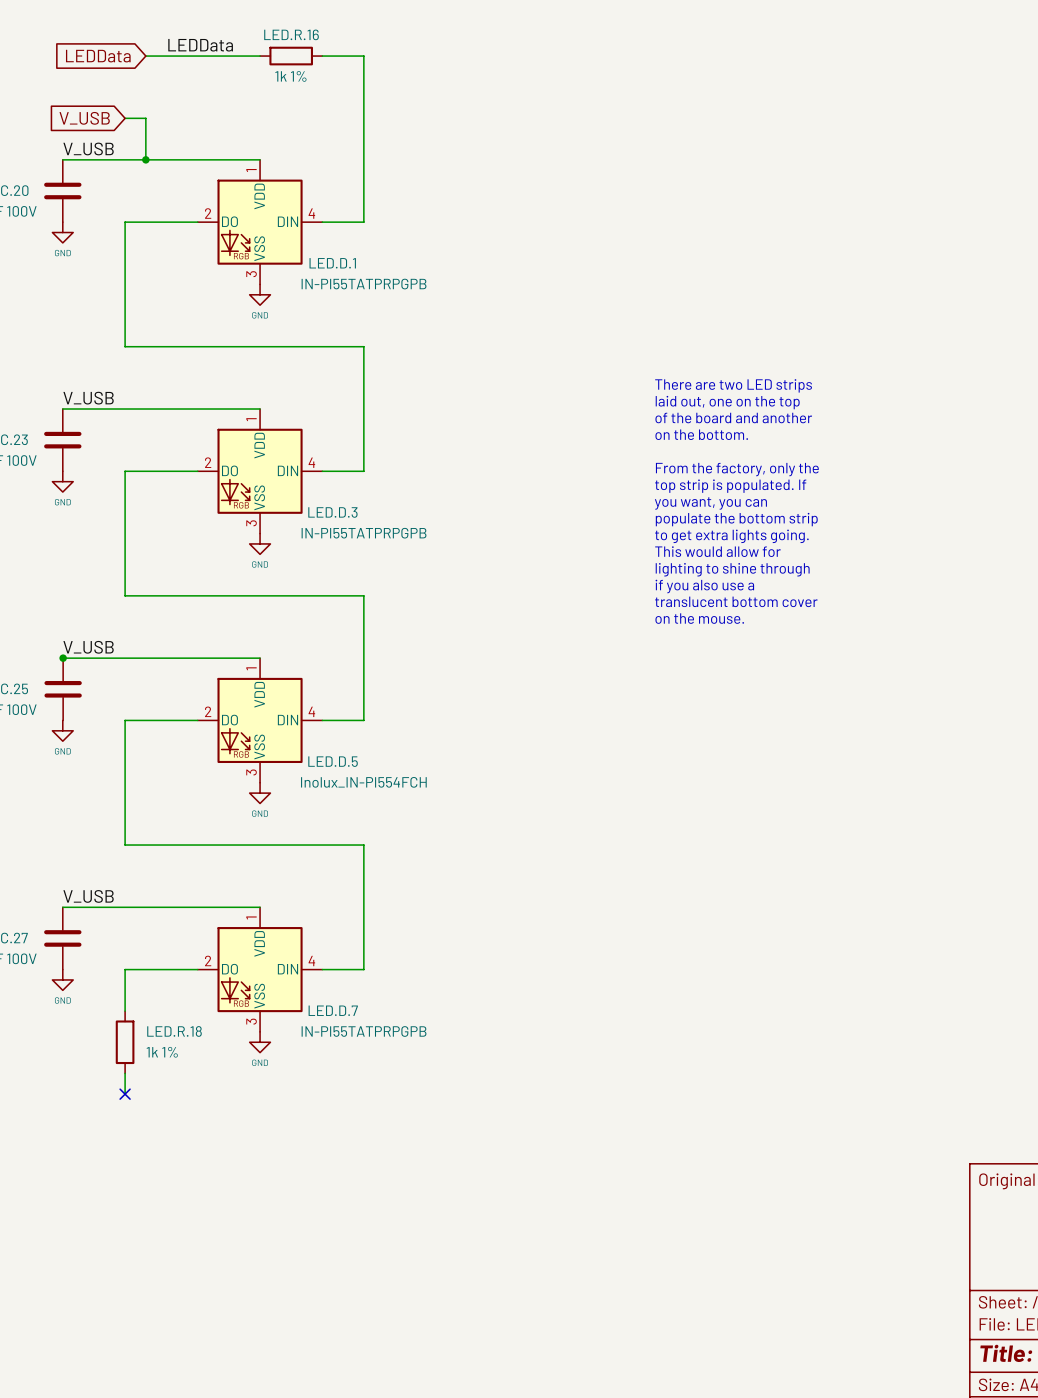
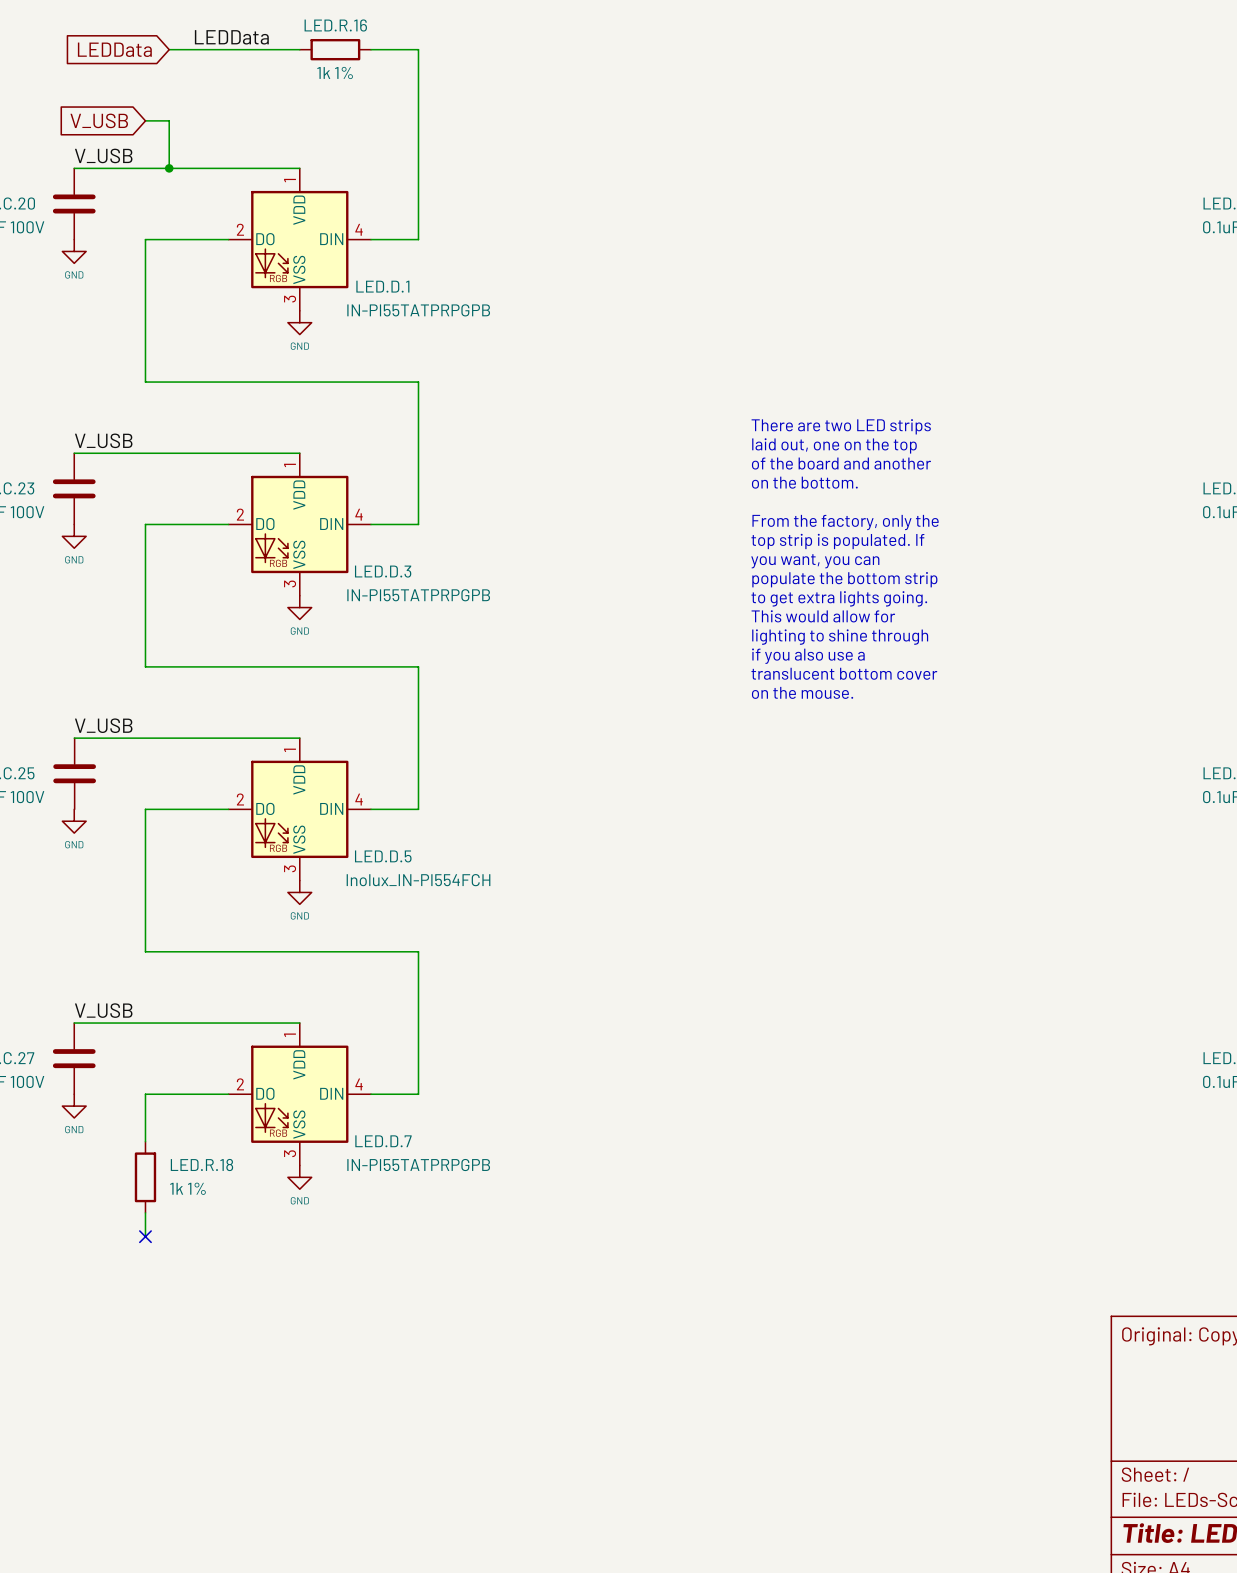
junction: (63, 658) -> none

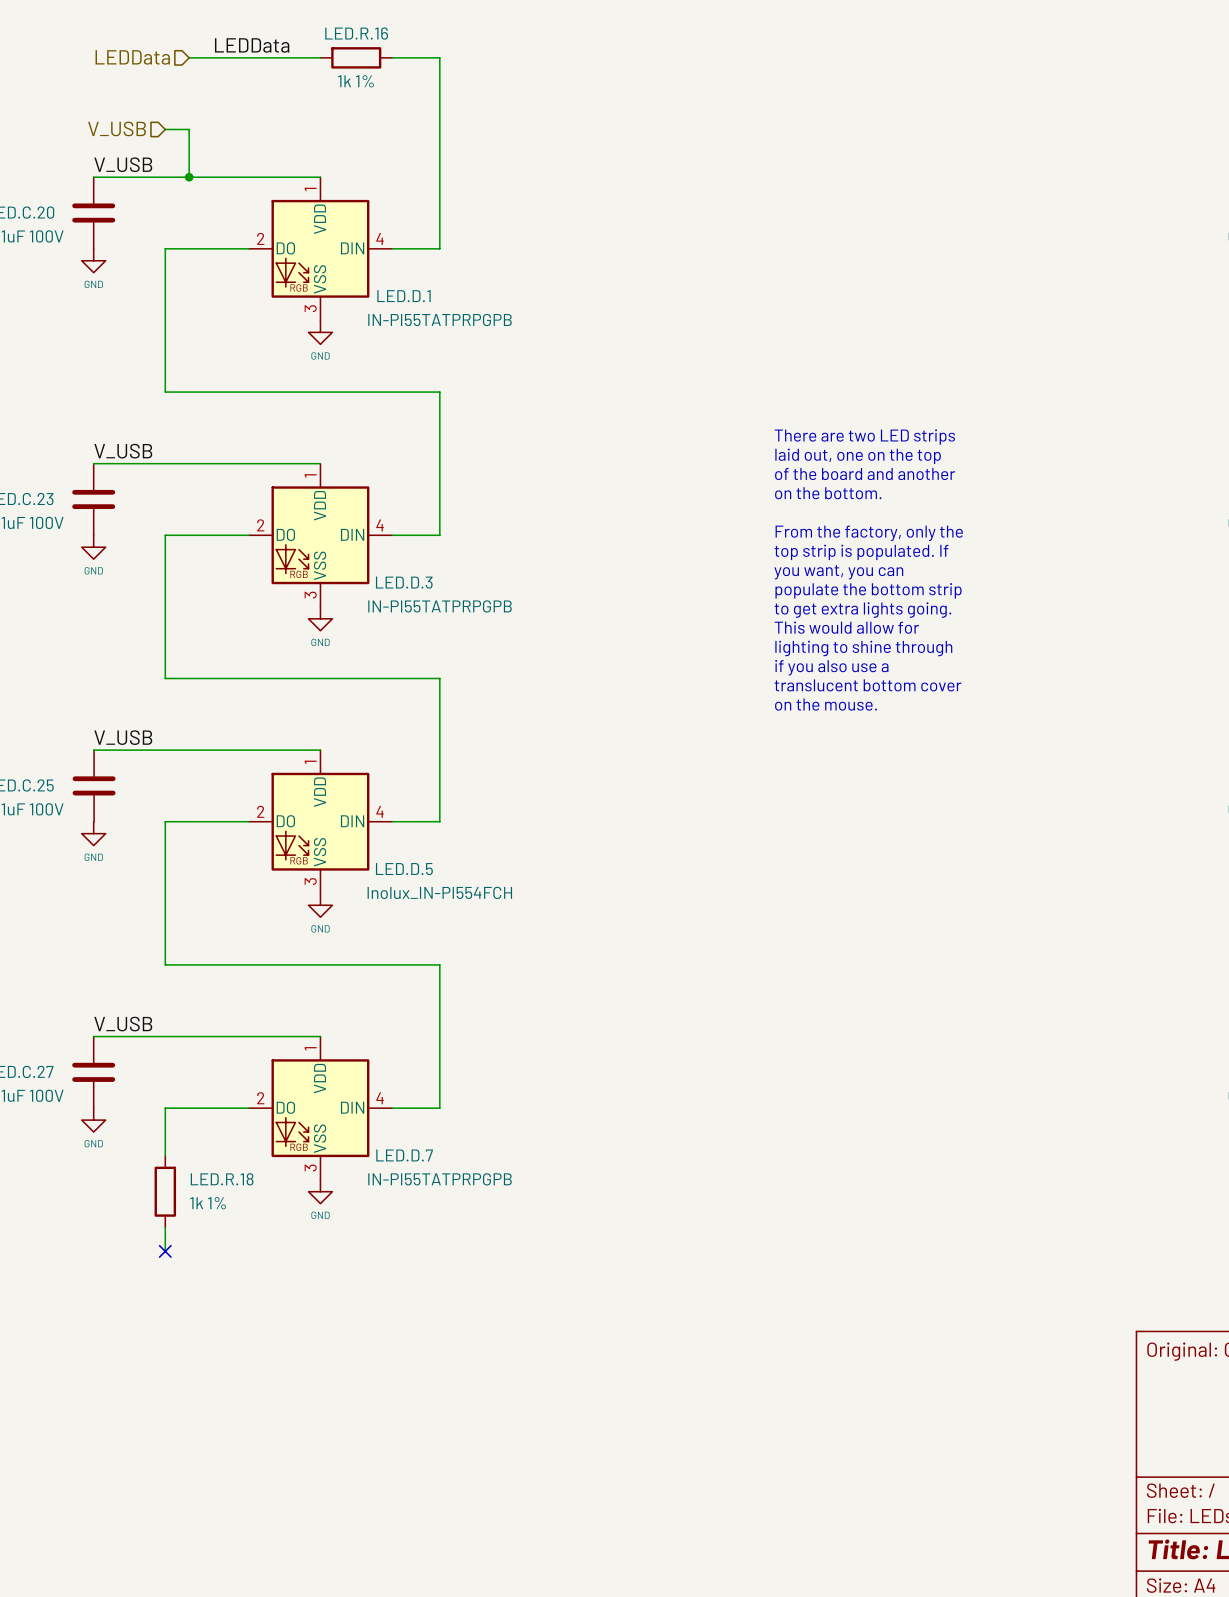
hierarchical label: none -> LEDData (132, 57)
global label: LEDData (114, 49) -> none
hierarchical label: none -> V_USB (117, 128)
global label: V_USB (99, 120) -> none

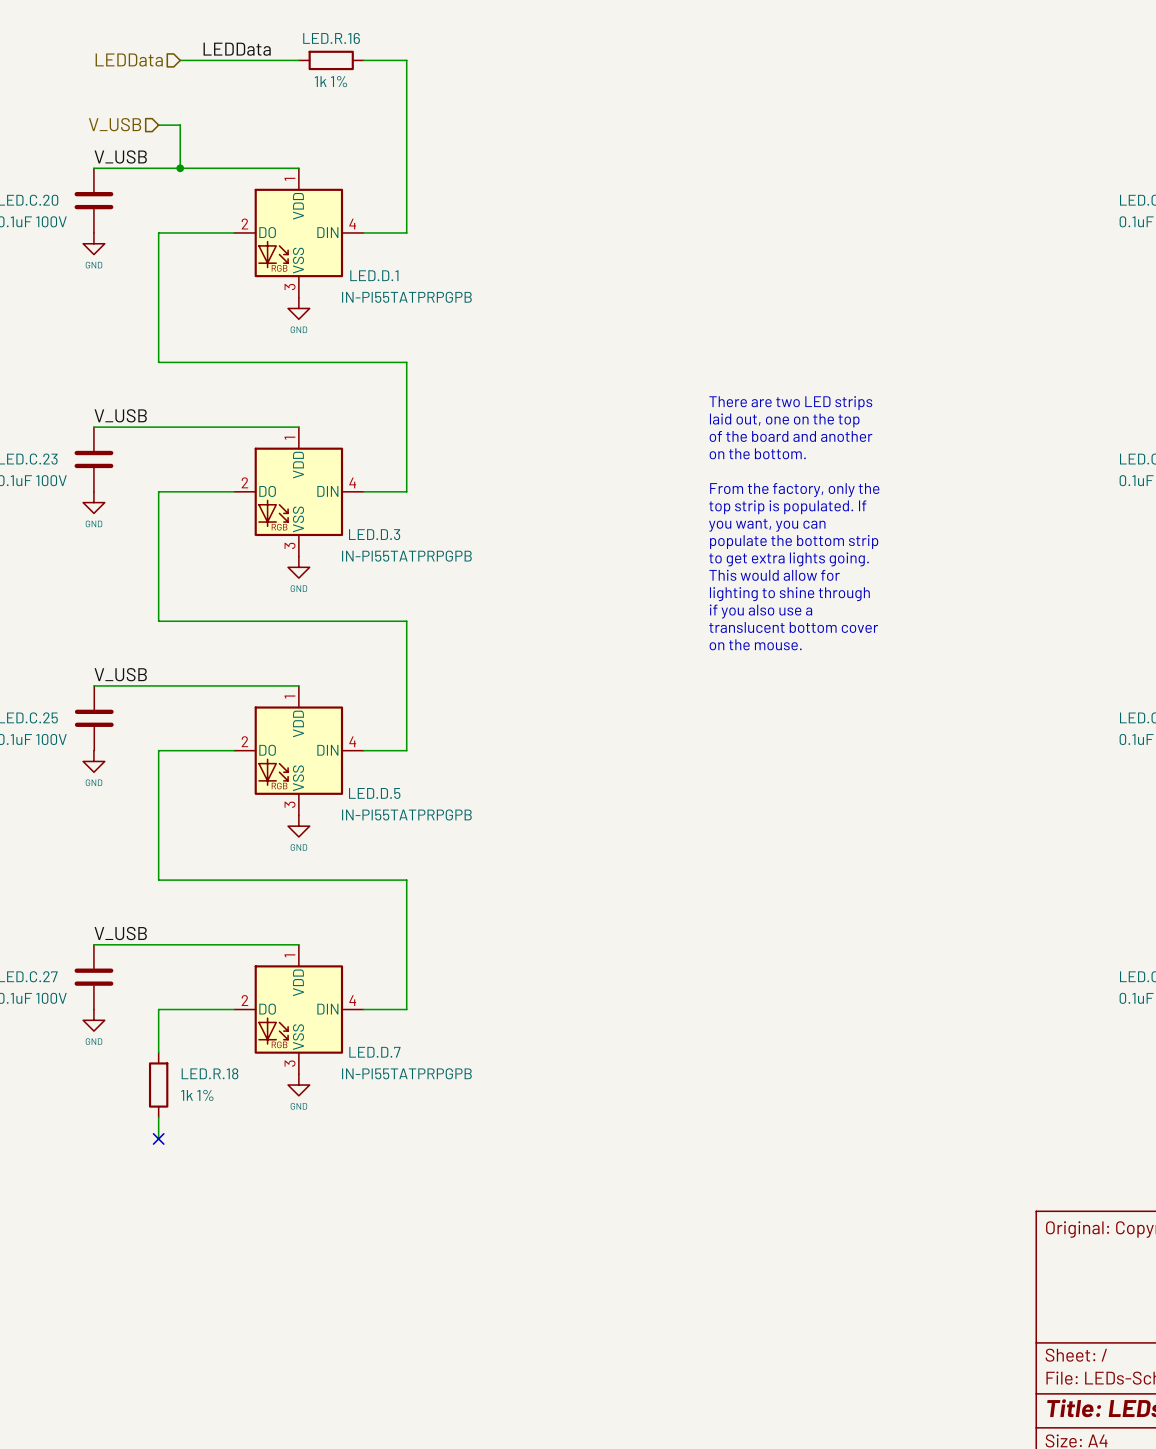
LED.D.5 value: Inolux_IN-PI554FCH (439, 892) -> IN-PI55TATPRPGPB (406, 814)

